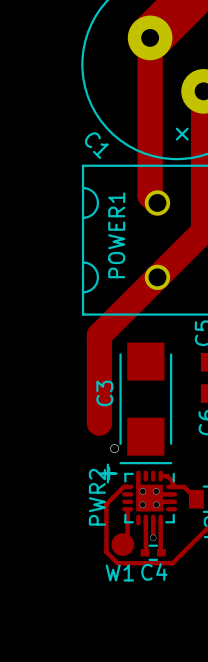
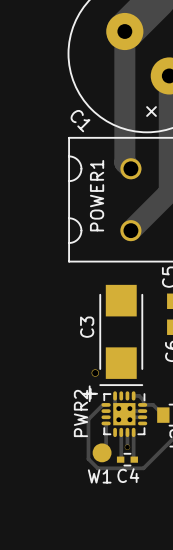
track: (157, 277) (99, 335) (99, 423) -> none

